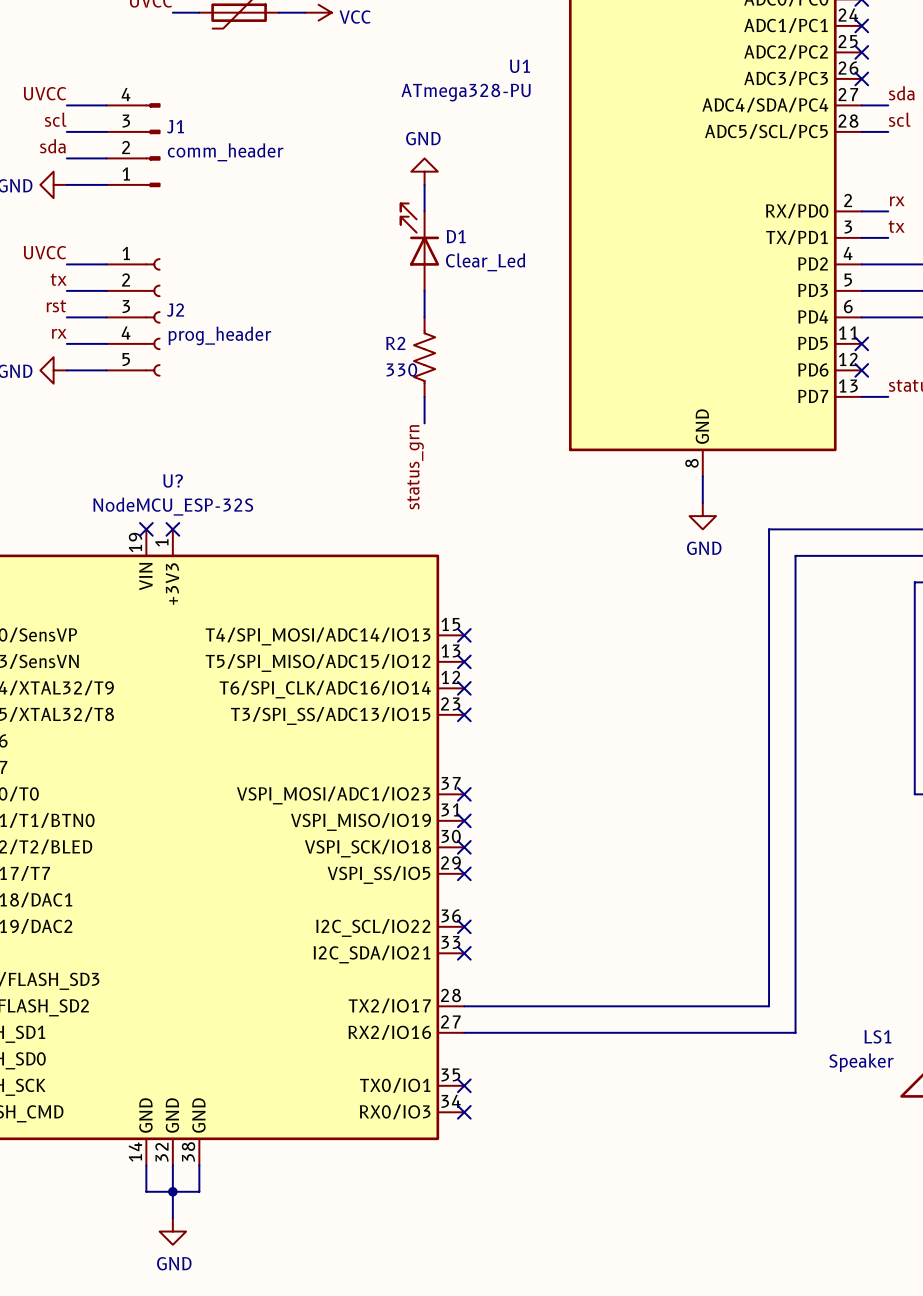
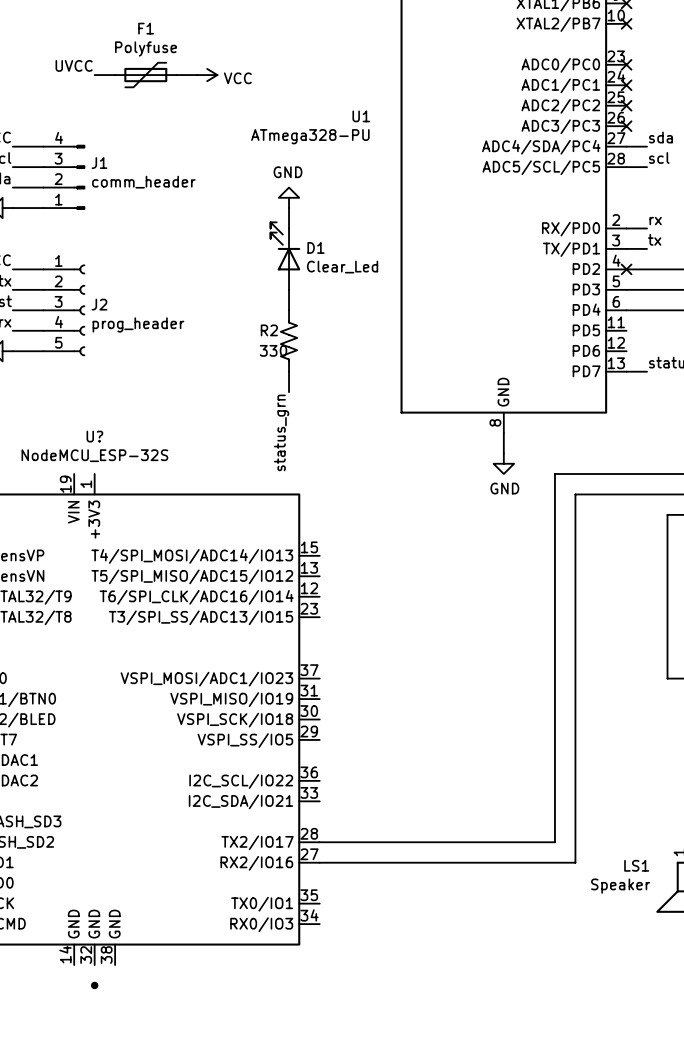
no-connect mark: none -> (626, 269)
no-connect mark: (861, 343) -> none
no-connect mark: (861, 370) -> none
no-connect mark: (146, 529) -> none
no-connect mark: (172, 529) -> none
no-connect mark: (464, 635) -> none
no-connect mark: (464, 661) -> none
no-connect mark: (464, 688) -> none
no-connect mark: (464, 714) -> none
no-connect mark: (464, 794) -> none
no-connect mark: (464, 820) -> none
no-connect mark: (464, 847) -> none
no-connect mark: (464, 873) -> none
no-connect mark: (464, 926) -> none
no-connect mark: (464, 953) -> none
no-connect mark: (464, 1085) -> none
no-connect mark: (464, 1112) -> none
wire: (146, 1165) (146, 1191) (199, 1191) (199, 1165) -> none
wire: (172, 1165) (172, 1218) -> none
power symbol: GND (172, 1231) -> none

